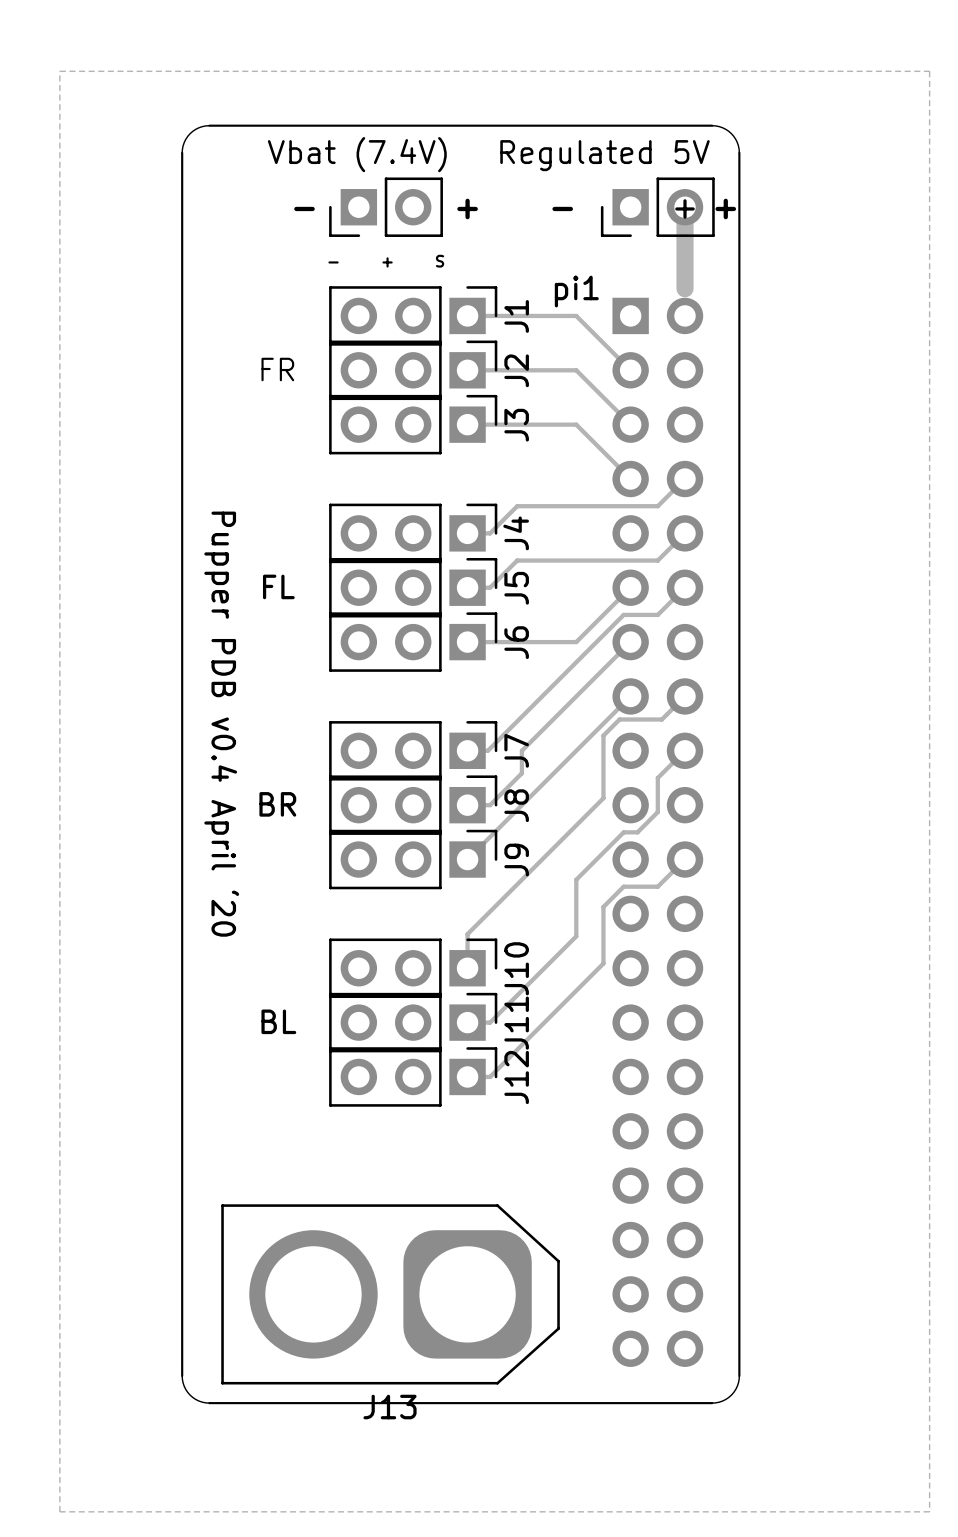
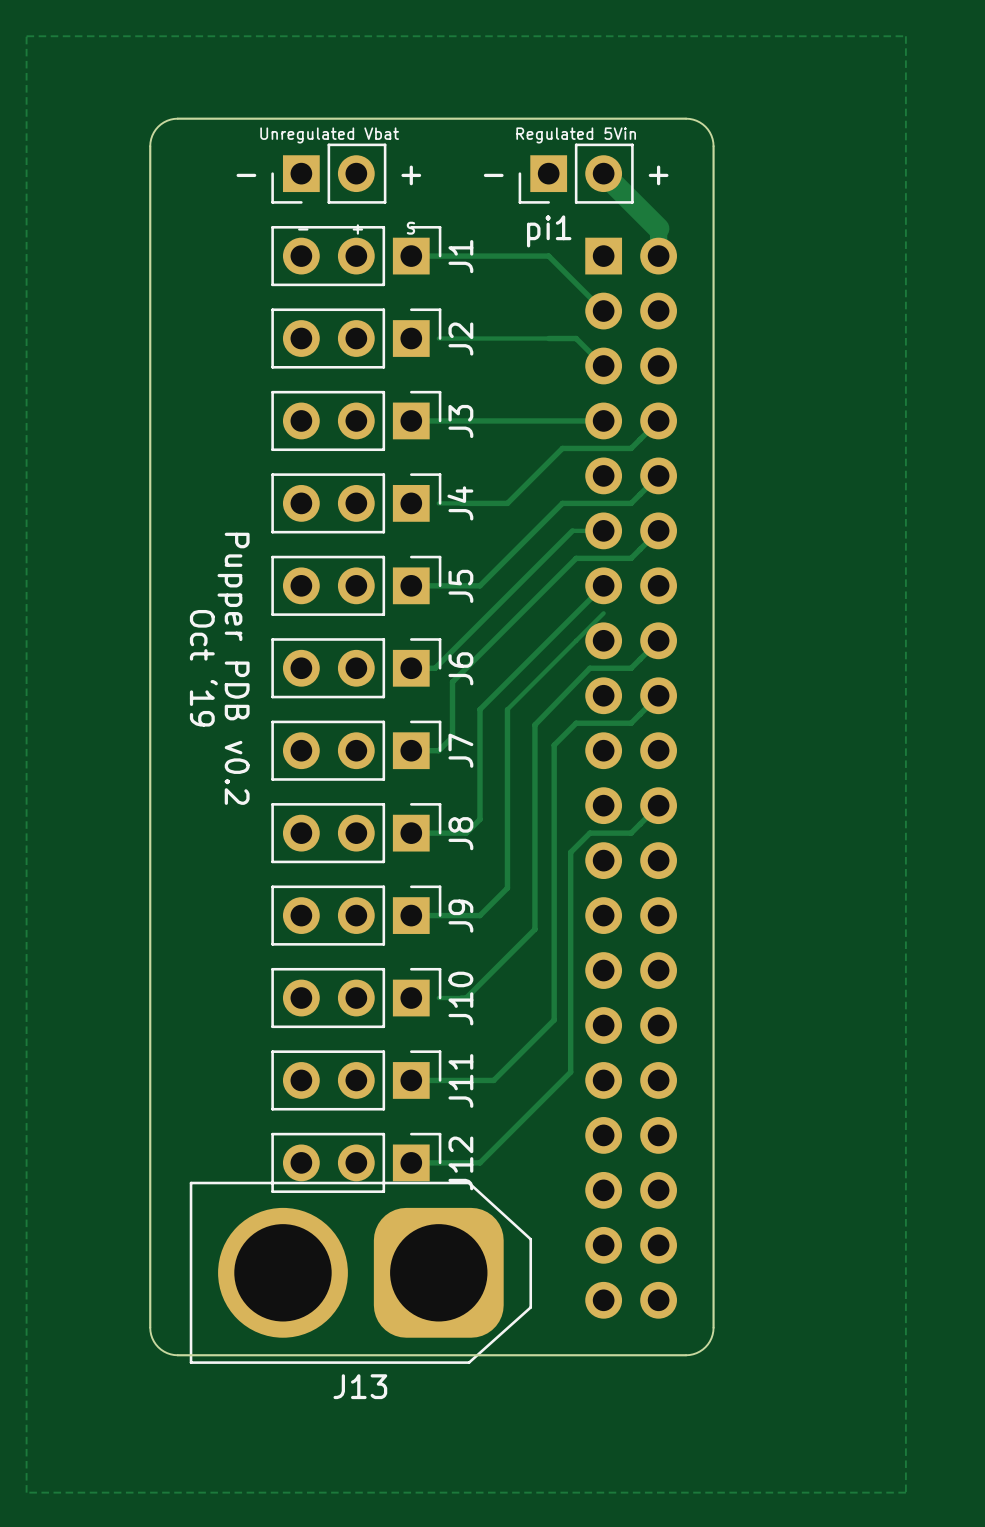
board edge: (182, 152) (184, 142) (190, 133) (198, 127) (209, 125) (712, 125) (725, 129) (735, 139) (739, 149) (739, 180) -> (150, 146) (152, 135) (158, 126) (167, 120) (177, 118) (686, 118) (696, 120) (705, 126) (711, 135) (713, 146)
board edge: (182, 152) (182, 180) -> none
text: Vbat (7.4V) (357, 154) -> Unregulated Vbat (329, 135)
text: Regulated 5V (604, 155) -> Regulated 5Vin (576, 135)
part position: (386, 207) -> (328, 173)
part position: (657, 207) -> (576, 173)
track: (685, 207) (685, 261) -> (603, 173) (658, 228)
text position: - (304, 208) -> - (246, 175)
text position: + (467, 208) -> + (411, 175)
text position: - (562, 208) -> - (493, 175)
text: + (725, 208) -> none
track: none -> (411, 256) (548, 256) (603, 311)
J1 position: (413, 315) -> (356, 256)
track: (467, 315) (576, 315) (630, 370) -> none
text: FR (277, 369) -> none
J2 position: (413, 370) -> (356, 338)
track: (576, 370) (630, 424) -> (548, 338) (576, 338) (603, 366)
J3 position: (413, 424) -> (356, 420)
track: (467, 424) (576, 424) (630, 479) -> none
track: none -> (411, 420) (603, 420)
track: (685, 479) (657, 506) (517, 506) (490, 533) -> (658, 420) (631, 448) (562, 448) (507, 503) (461, 503)
track: none -> (658, 475) (631, 503) (562, 503) (479, 585) (411, 585)
J4 position: (413, 533) -> (356, 503)
track: (685, 533) (657, 560) (630, 560) -> none
track: (599, 560) (517, 560) (490, 587) (467, 587) -> (572, 530) (435, 668) (411, 668)
track: none -> (658, 530) (631, 558) (576, 558) (452, 682) (452, 736) (438, 750) (411, 750)
text: FL (278, 586) -> none
J5 position: (413, 587) -> (356, 585)
track: (630, 587) (576, 642) (467, 642) -> none
track: (685, 587) (657, 614) (623, 614) (487, 750) (467, 750) -> none
track: none -> (603, 585) (479, 709) (479, 819) (466, 833) (411, 833)
J6 position: (413, 642) -> (356, 668)
text: none -> Oct ‘19 (203, 668)
track: (630, 696) (467, 859) -> none
track: (685, 696) (661, 719) (619, 719) (603, 735) (603, 798) (467, 934) (467, 968) -> none
track: none -> (658, 695) (631, 723) (576, 723) (554, 745) (554, 1020) (493, 1080) (411, 1080)
text: Pupper PDB v0.4 April ‘20 (221, 724) -> Pupper PDB v0.2 (233, 668)
track: (535, 737) (521, 750) (521, 773) (490, 805) (467, 805) -> (507, 709) (507, 888) (479, 915) (411, 915)
J7 position: (413, 750) -> (356, 750)
track: (685, 750) (657, 777) (657, 812) (637, 832) (623, 832) (576, 879) (576, 936) (490, 1022) -> (658, 640) (631, 668) (589, 668) (534, 724) (534, 929) (466, 998) (461, 998)
text: BR (277, 804) -> none
J8 position: (413, 805) -> (356, 833)
pi1 position: (657, 832) -> (631, 778)
track: none -> (658, 805) (631, 833) (589, 833) (570, 852) (570, 1072) (479, 1162) (411, 1162)
J9 position: (413, 859) -> (356, 915)
track: (685, 859) (657, 886) (623, 886) (603, 906) (603, 963) (490, 1076) (467, 1076) -> none
J10 position: (413, 968) -> (356, 998)
text: BL (278, 1021) -> none
J11 position: (413, 1022) -> (356, 1080)
J12 position: (413, 1076) -> (356, 1162)
board edge: (182, 1348) (184, 1386) (192, 1397) (205, 1402) (712, 1403) (725, 1399) (735, 1389) (739, 1379) (739, 1348) -> (150, 1327) (152, 1338) (158, 1347) (167, 1353) (177, 1355) (686, 1355) (696, 1353) (705, 1347) (711, 1338) (713, 1327)

